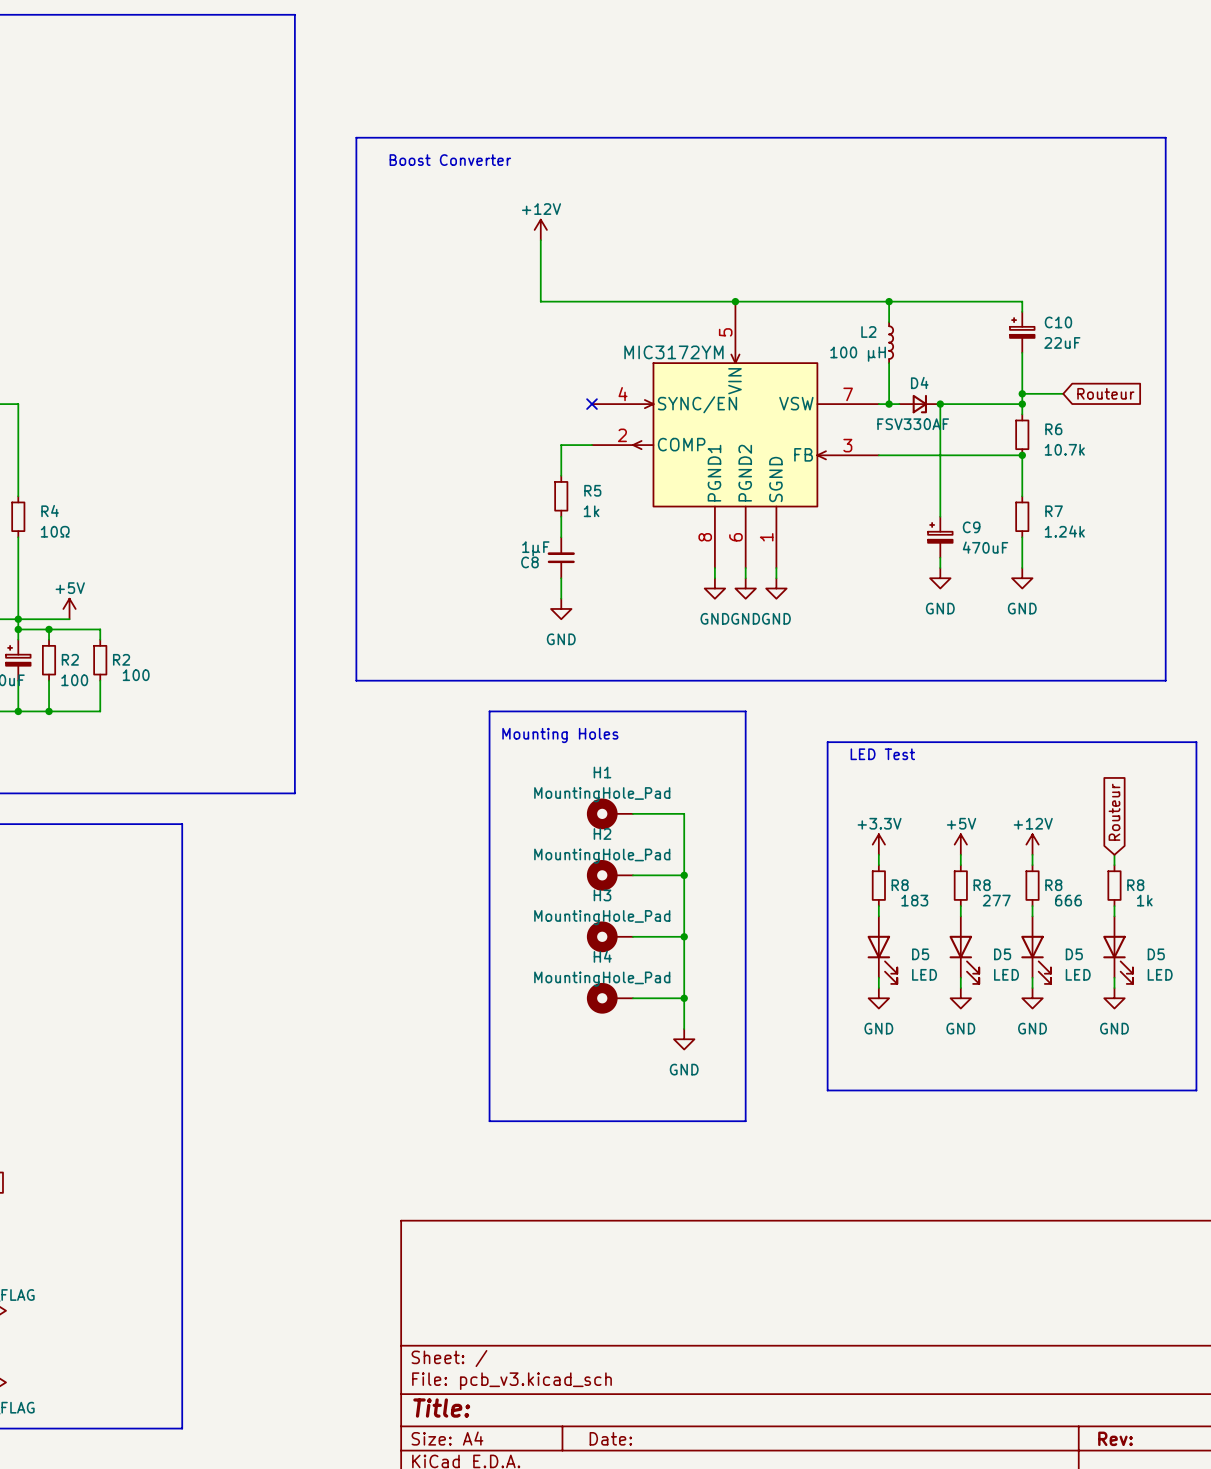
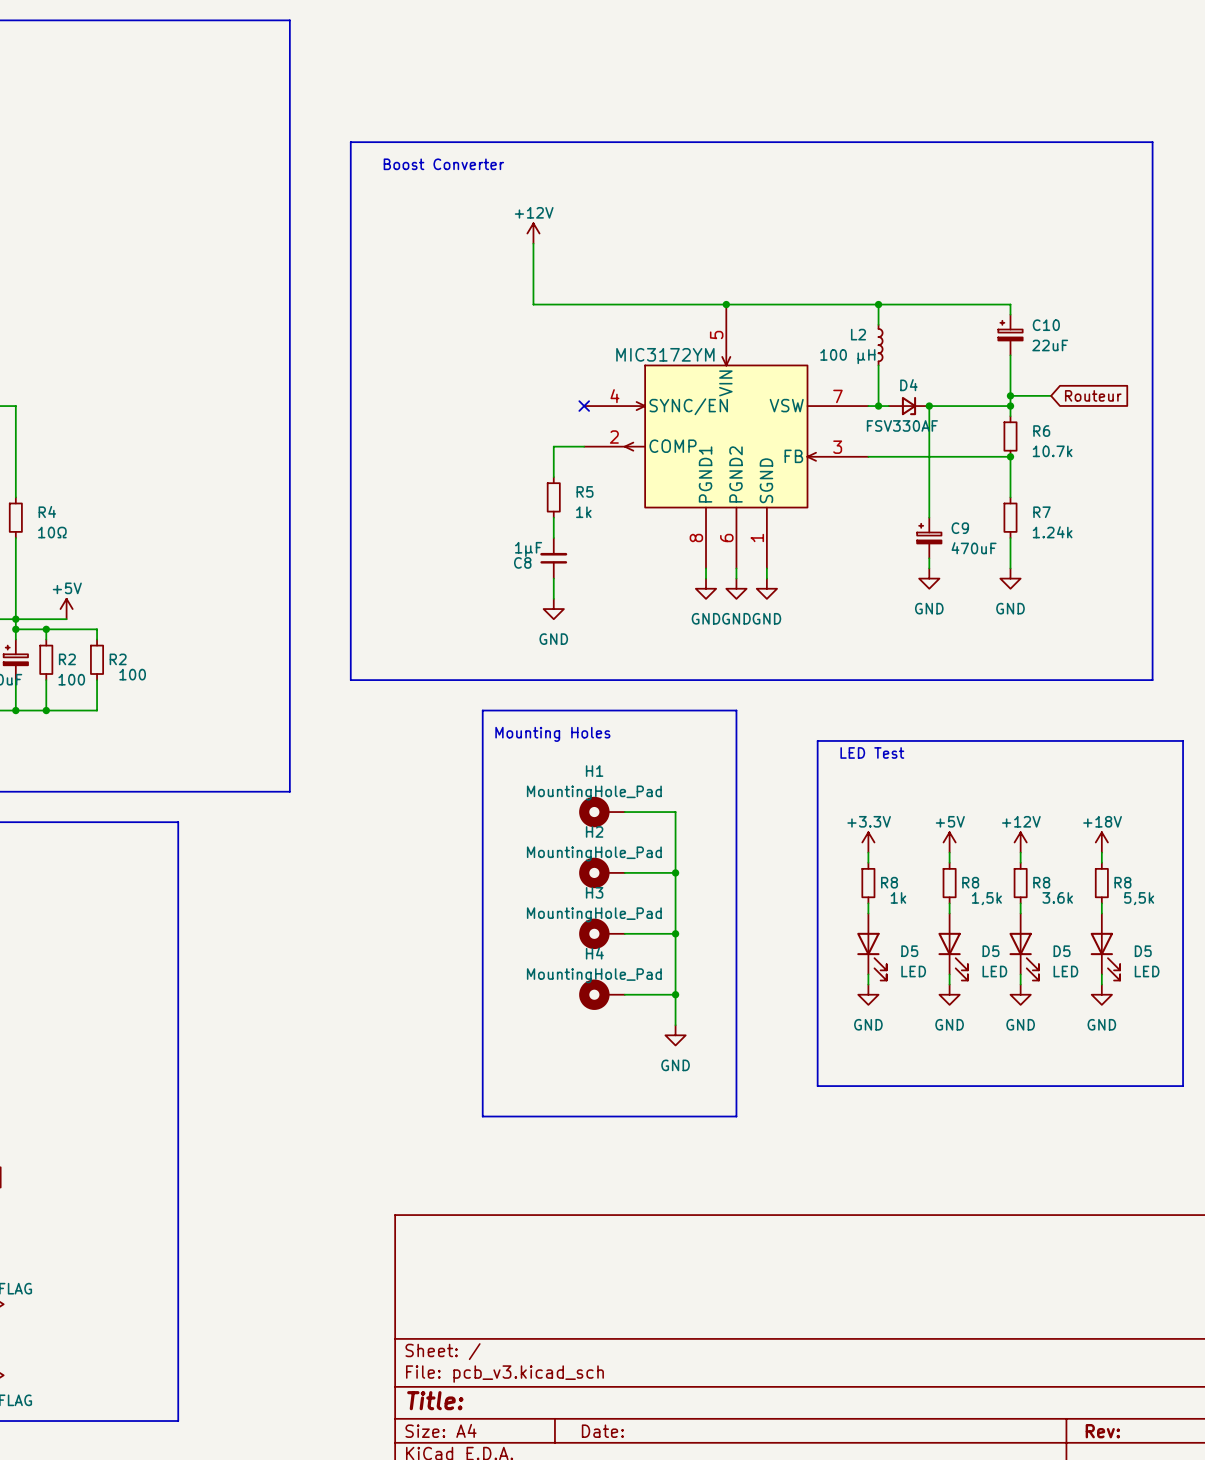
global label: Routeur (1114, 812) -> none
power symbol: none -> +18V (1101, 842)
R8 value: 183 (914, 900) -> 1k (898, 897)
R8 value: 277 (996, 900) -> 1,5k (986, 898)
R8 value: 666 (1068, 900) -> 3.6k (1057, 897)
R8 value: 1k (1144, 900) -> 5,5k (1139, 898)

